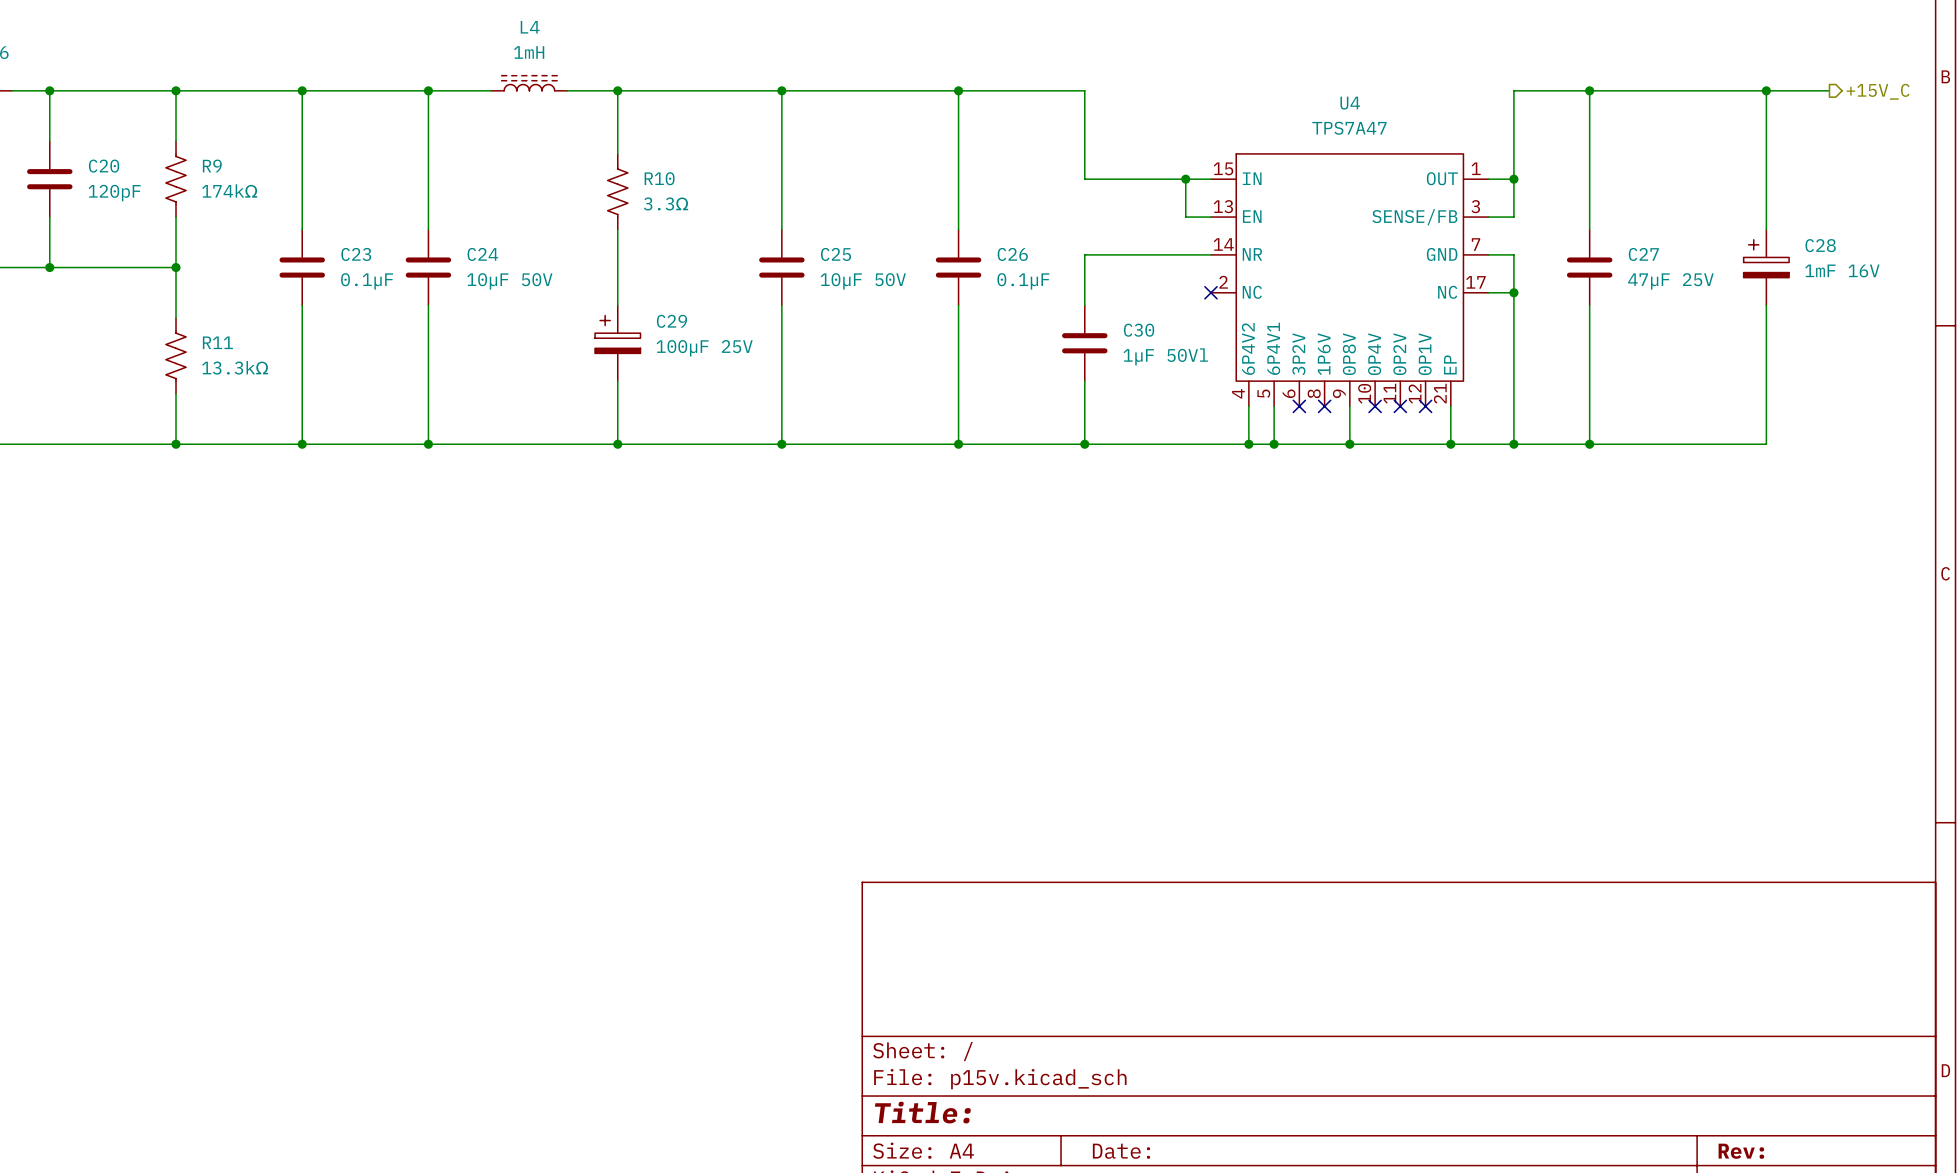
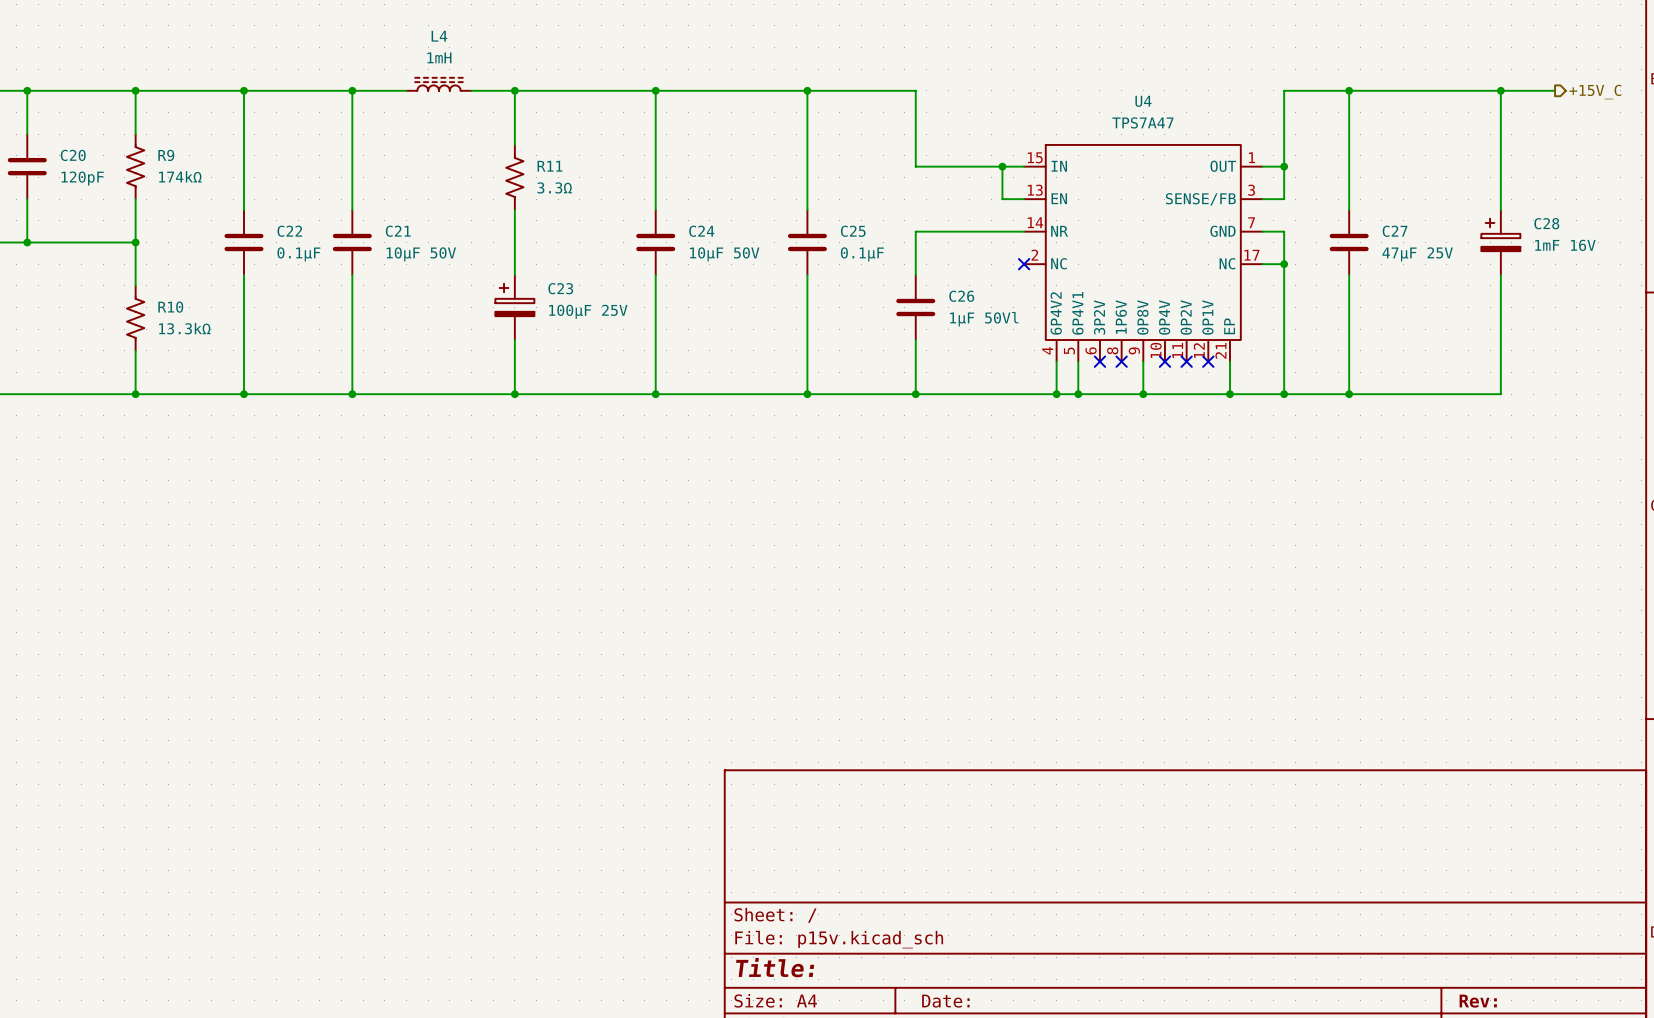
R10 name: R10 (659, 178) -> R11 (549, 166)
C23 name: C23 (356, 254) -> C22 (289, 231)
C24 name: C24 (482, 254) -> C21 (398, 231)
C25 name: C25 (836, 254) -> C24 (701, 231)
C26 name: C26 (1012, 254) -> C25 (853, 231)
C29 name: C29 (671, 321) -> C23 (560, 288)
C30 name: C30 (1139, 330) -> C26 (961, 296)
R11 name: R11 (217, 342) -> R10 (170, 307)

